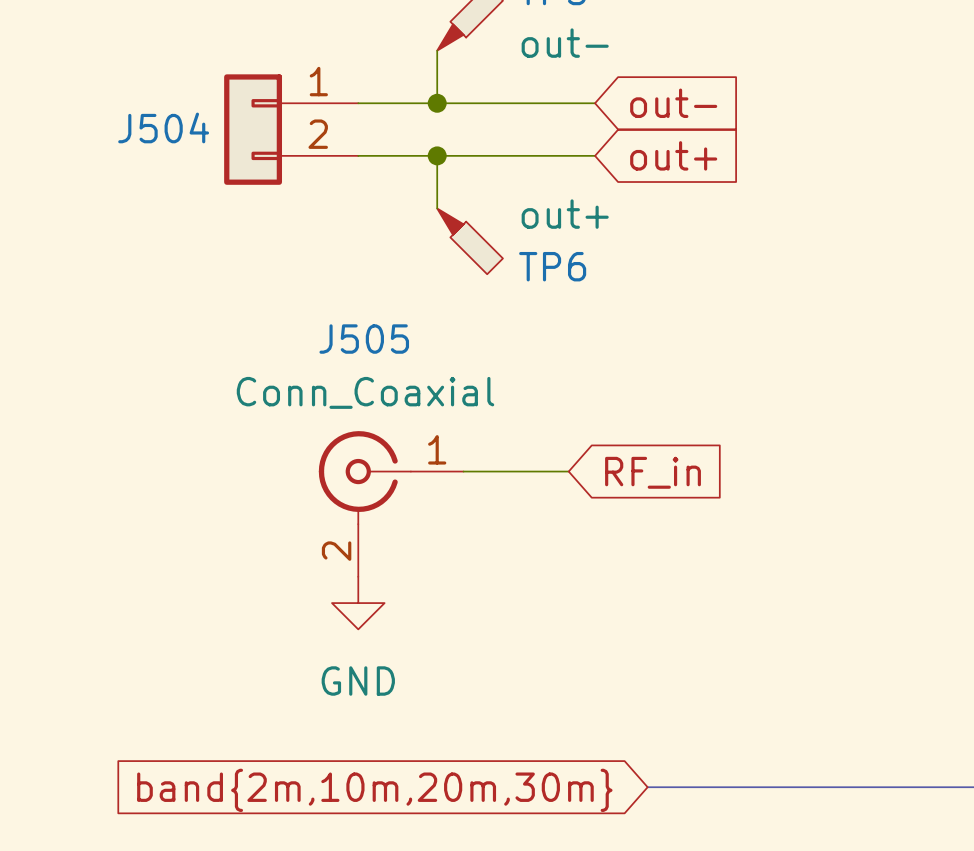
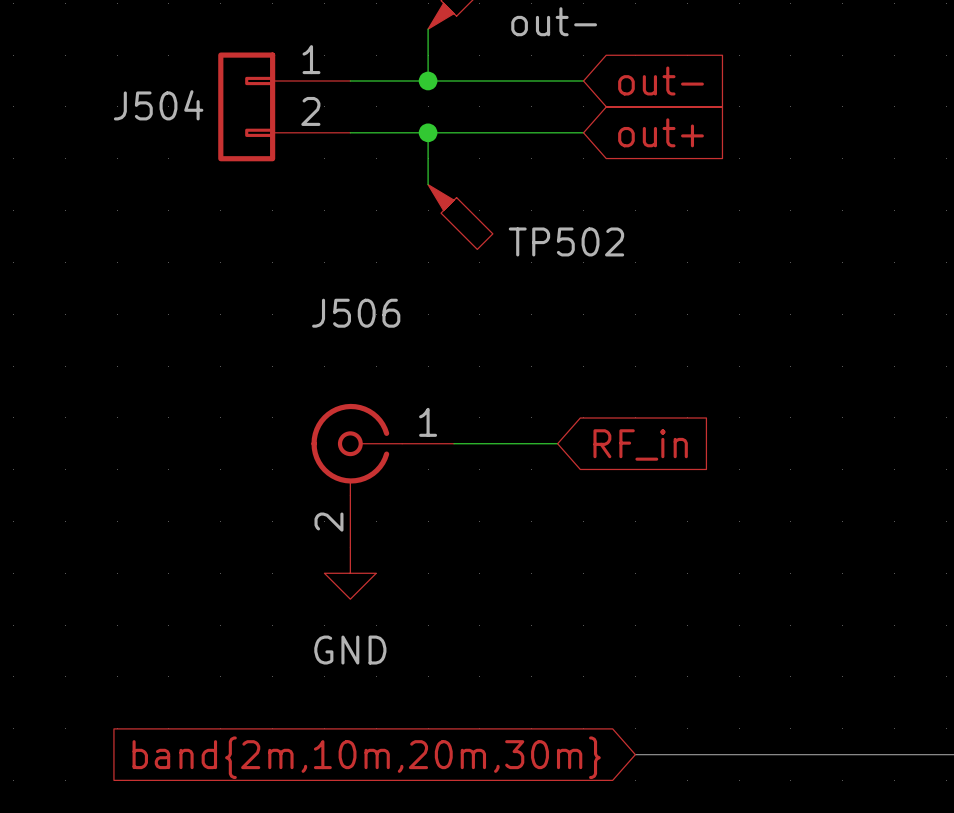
TP6 value: out+ (565, 214) -> none
TP6 name: TP6 (552, 266) -> TP502 (566, 241)
J505 name: J505 (364, 339) -> J506 (356, 313)
J505 value: Conn_Coaxial (365, 392) -> none

